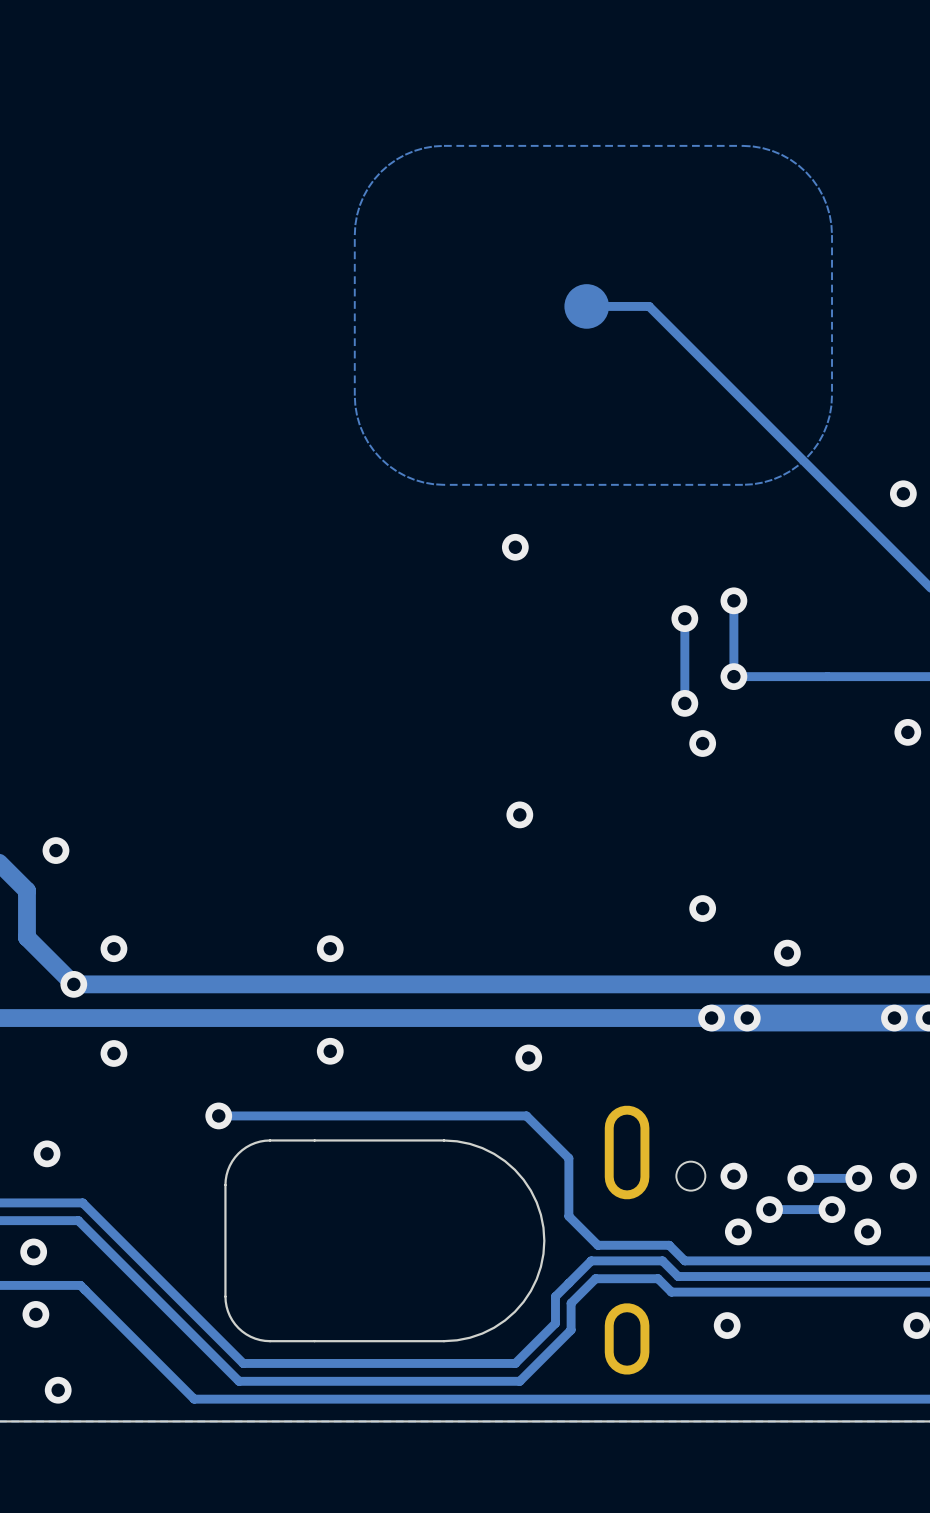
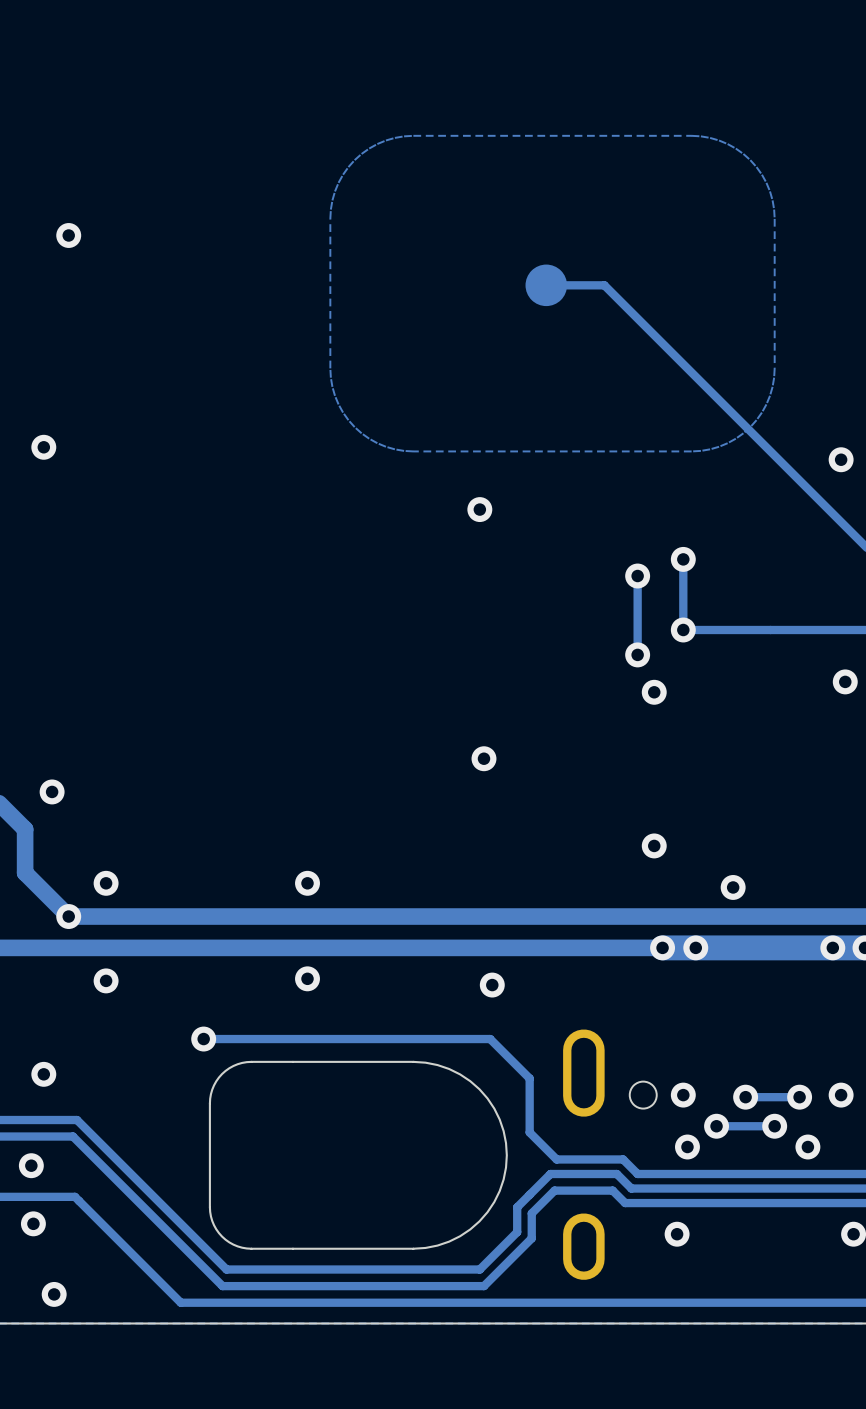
via: none -> (68, 235)
via: none -> (43, 447)

